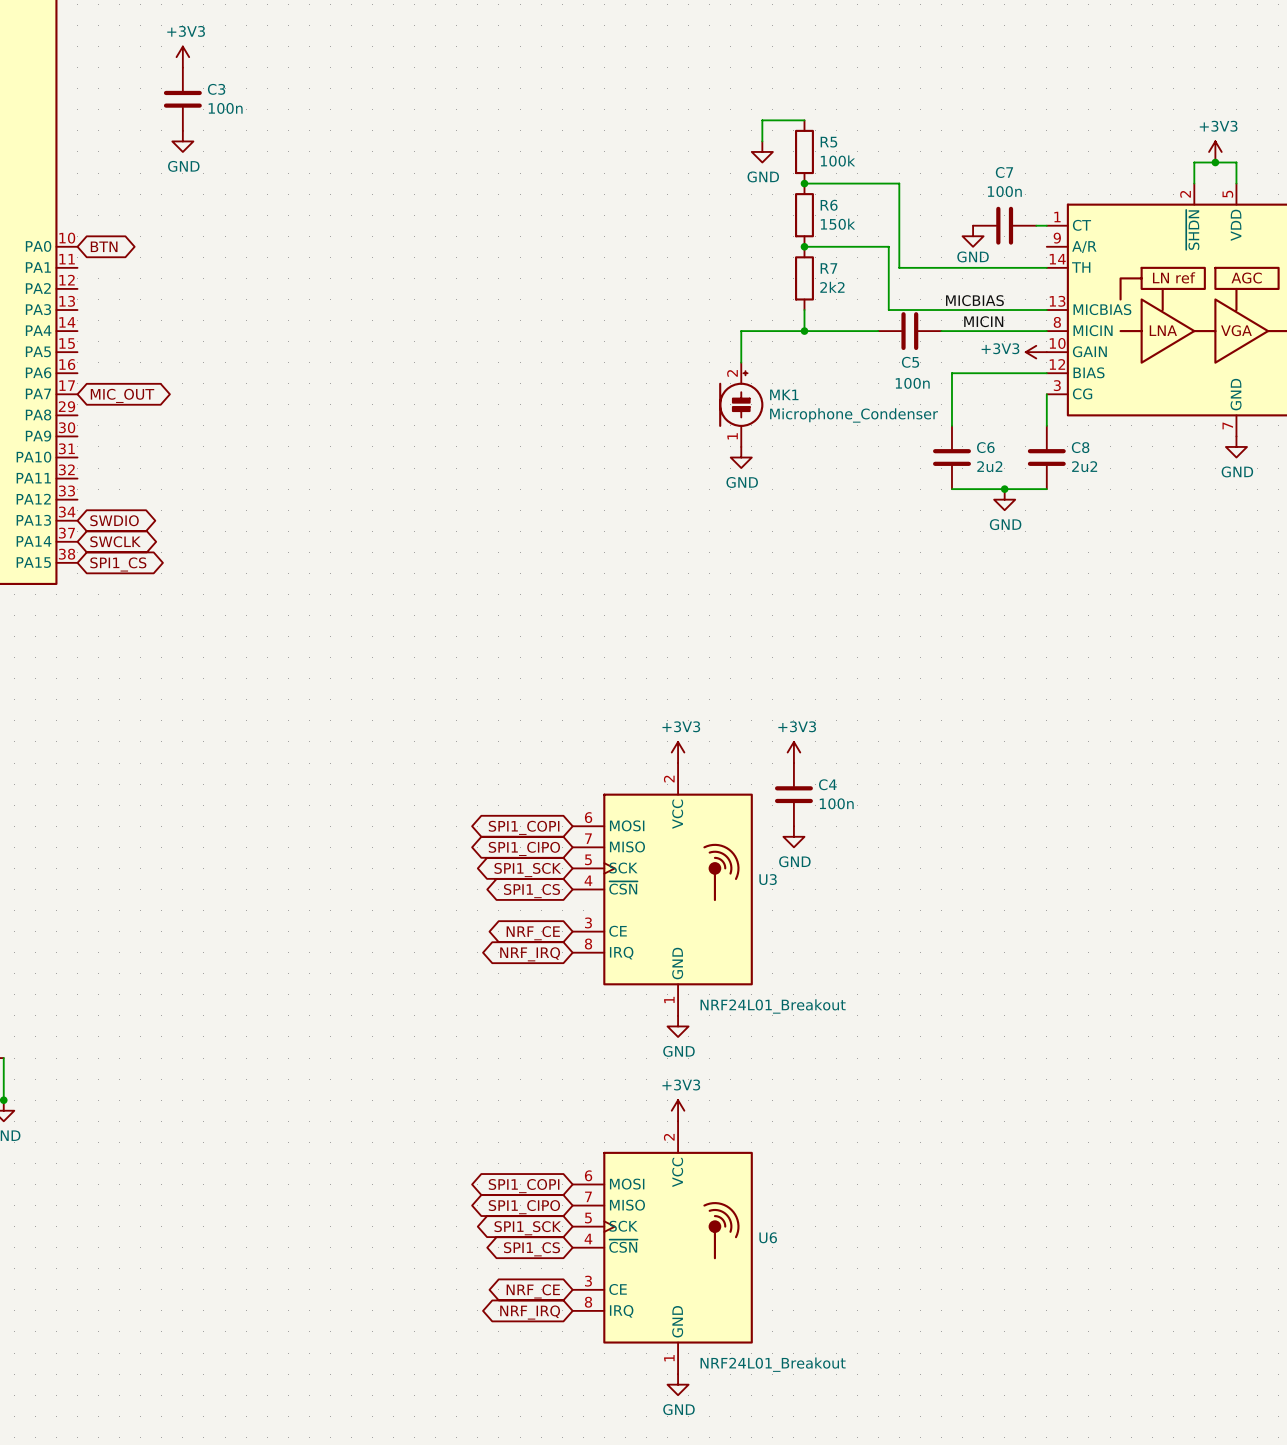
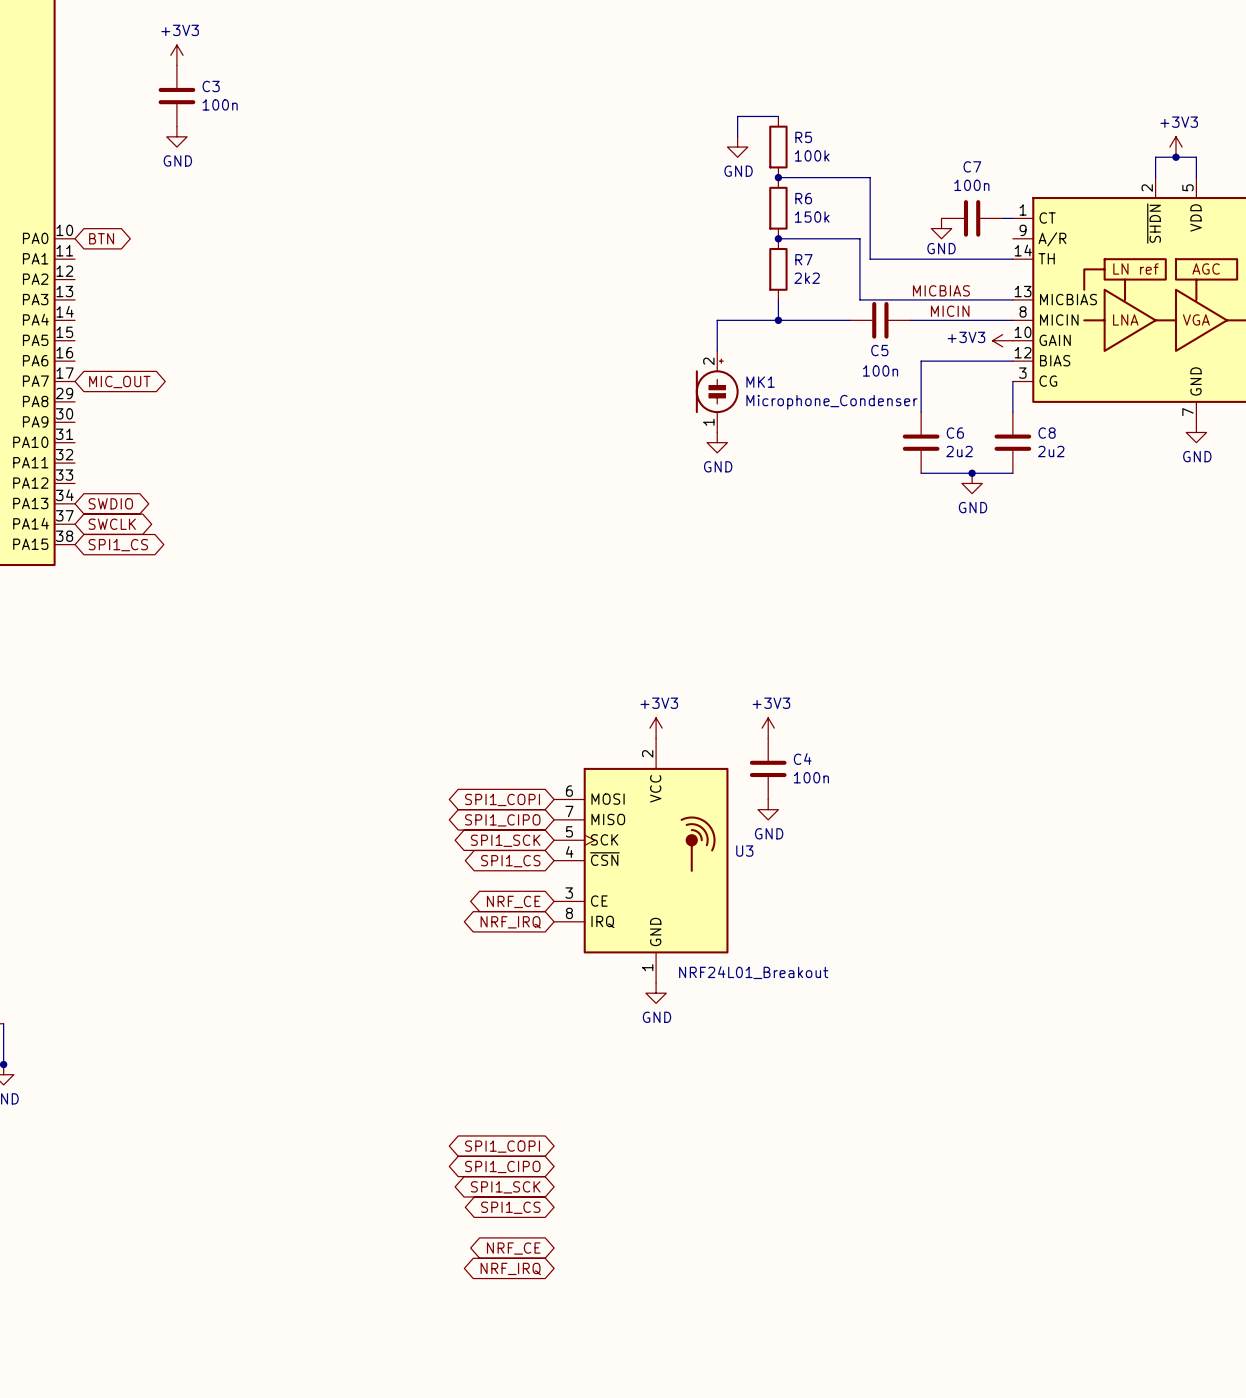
power symbol: +3V3 (678, 1110) -> none
U6: NRF24L01_Breakout (662, 1247) -> none
power symbol: GND (678, 1384) -> none

